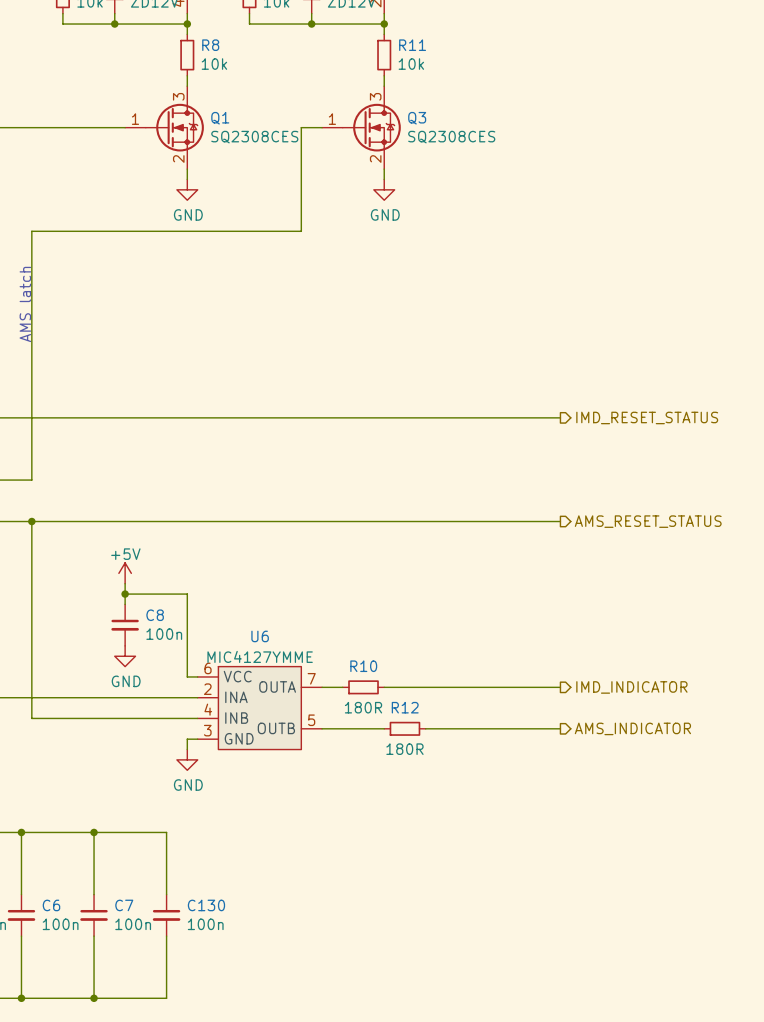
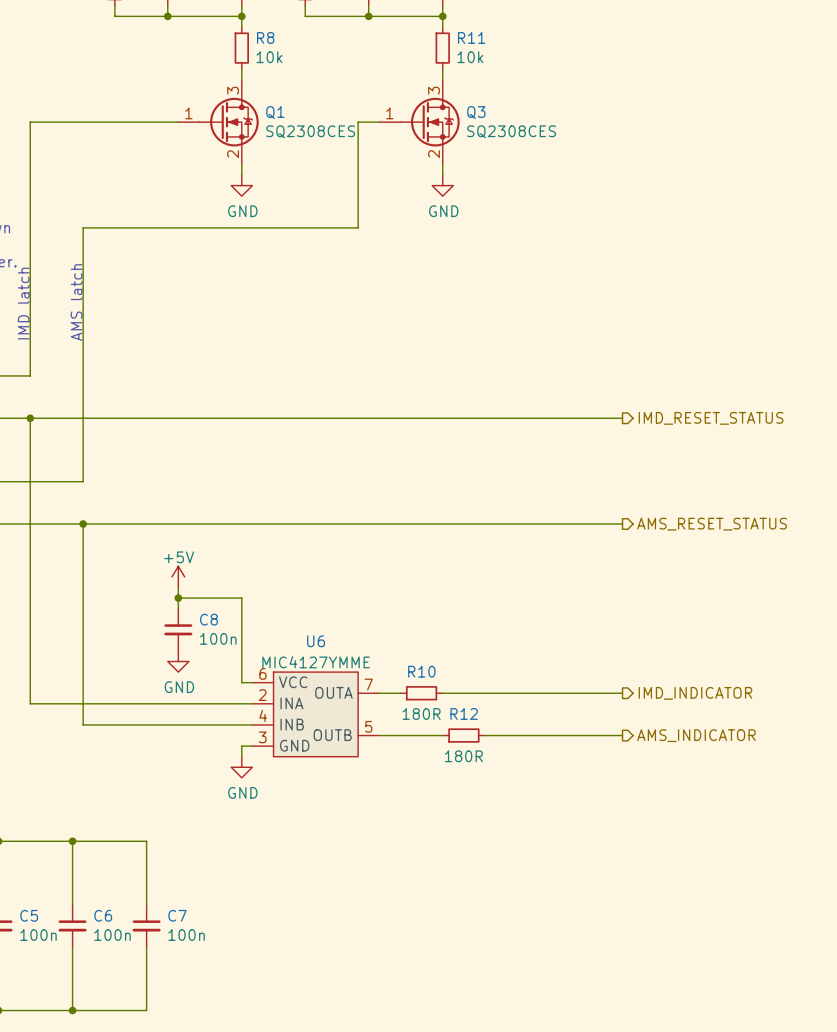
wire: (94, 832) (166, 832) (166, 894) -> none
junction: (94, 832) -> none
C130: 100n (166, 915) -> none
wire: (166, 936) (166, 998) (94, 998) -> none
junction: (94, 998) -> none

